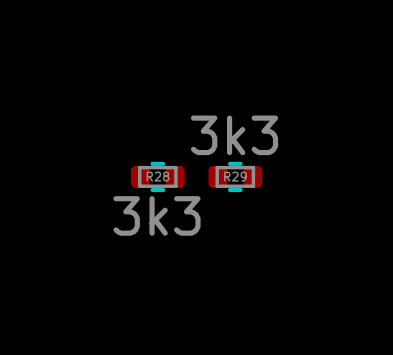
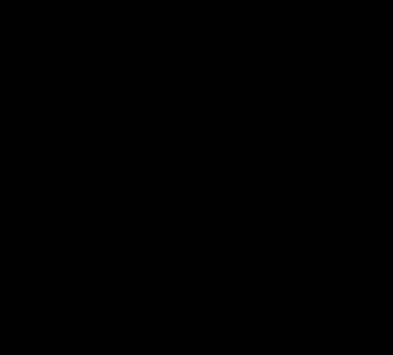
R28: 3k3 (157, 176) -> none
R29: 3k3 (235, 176) -> none

